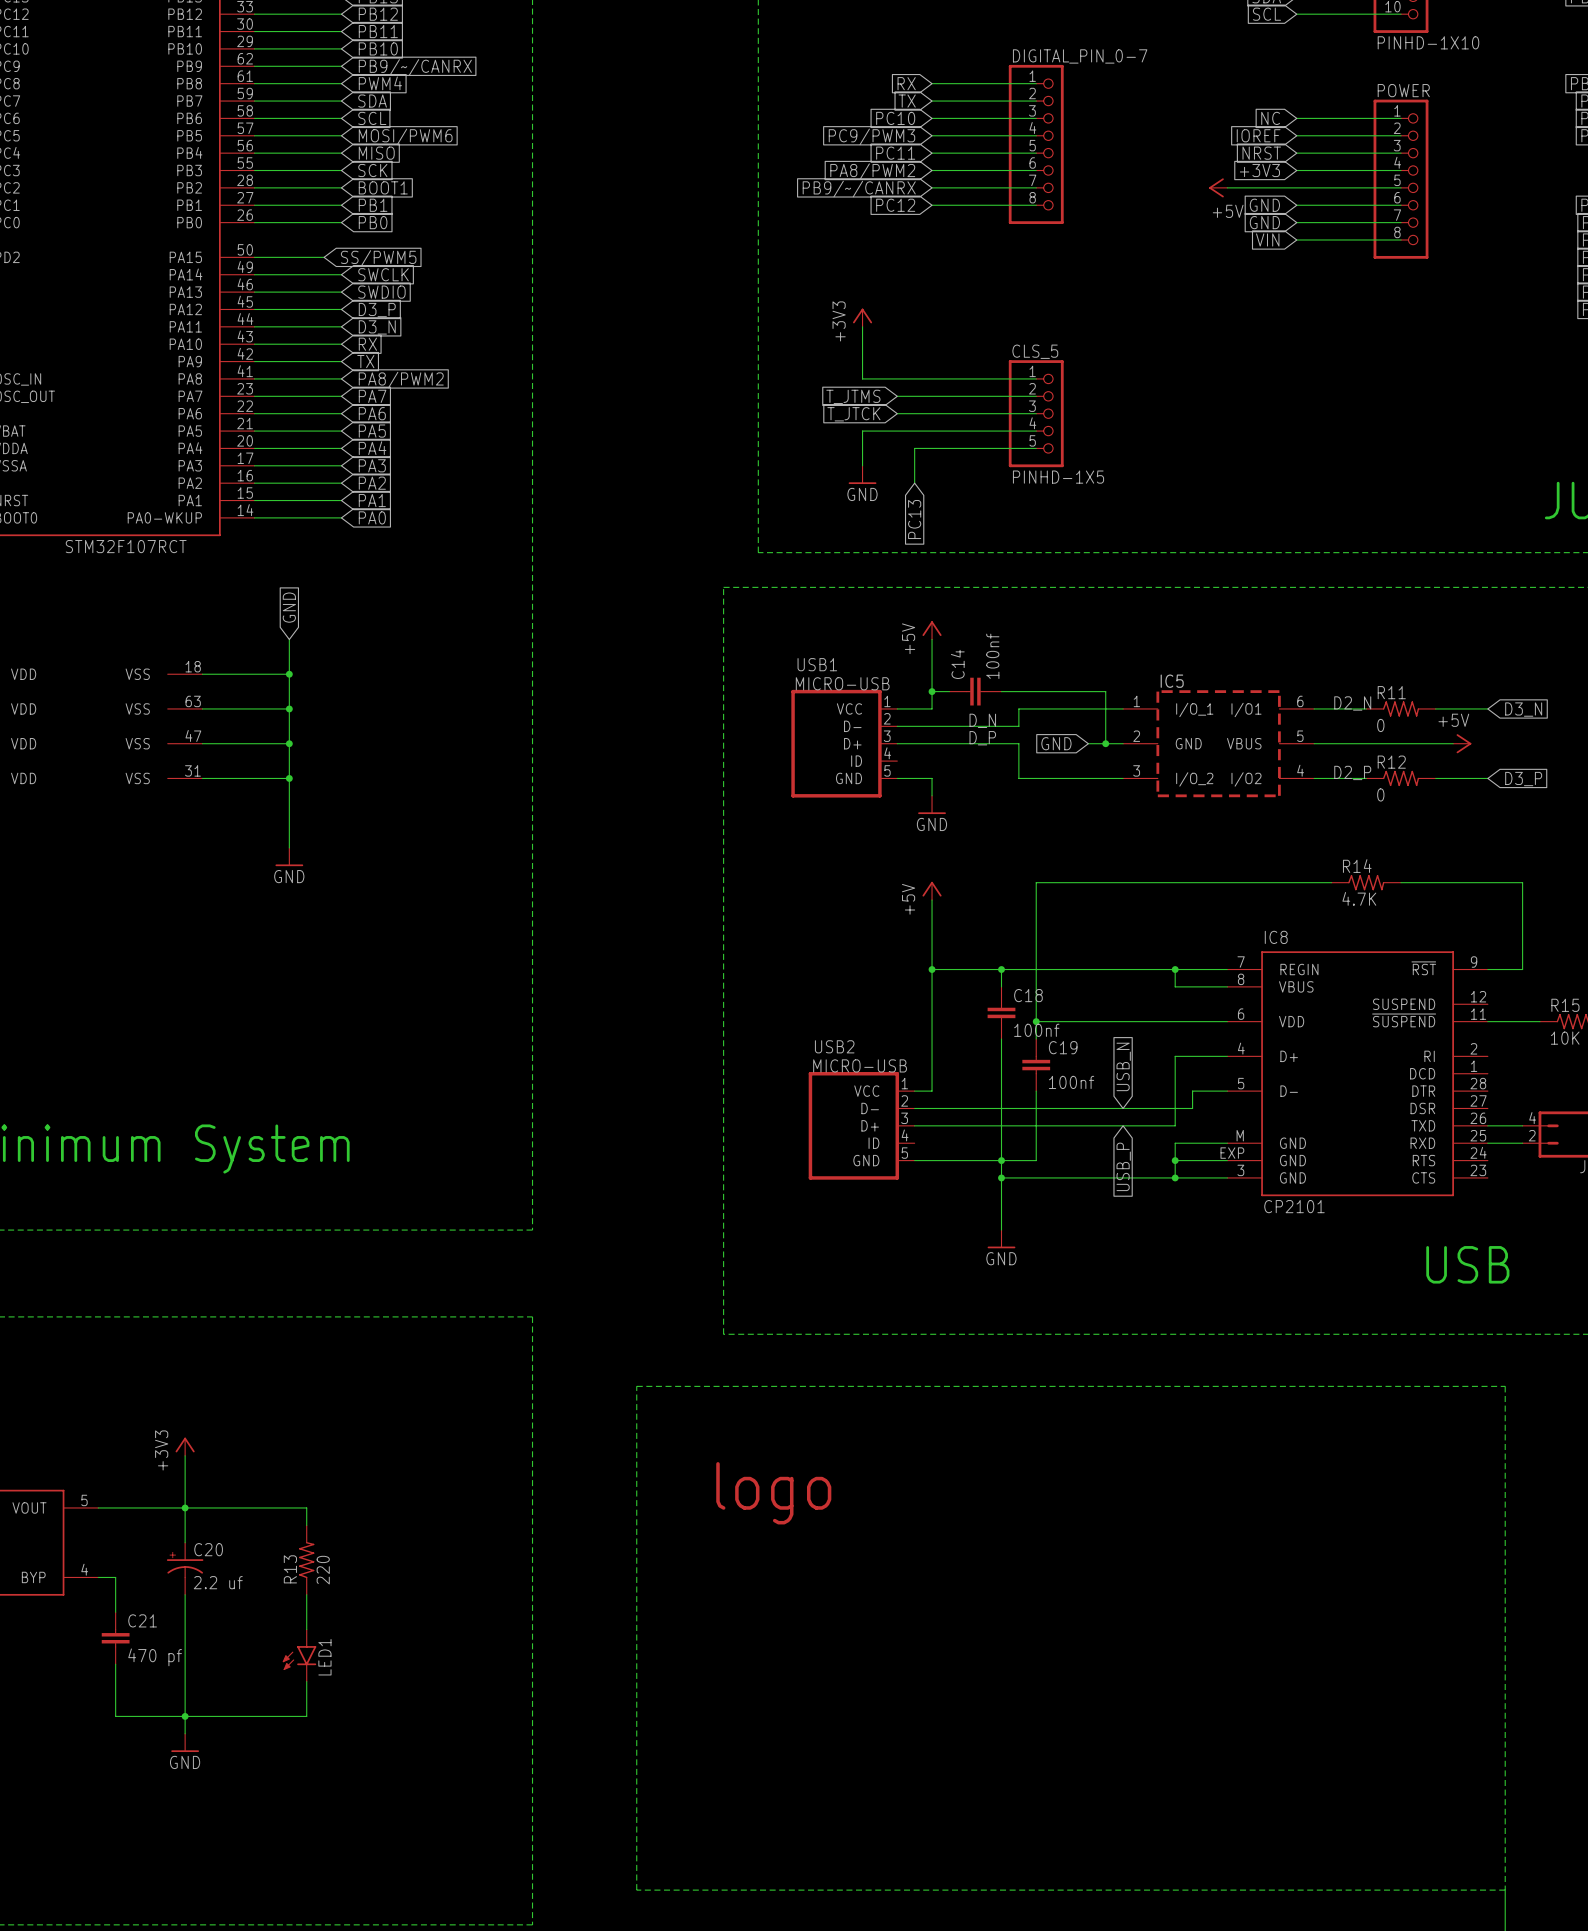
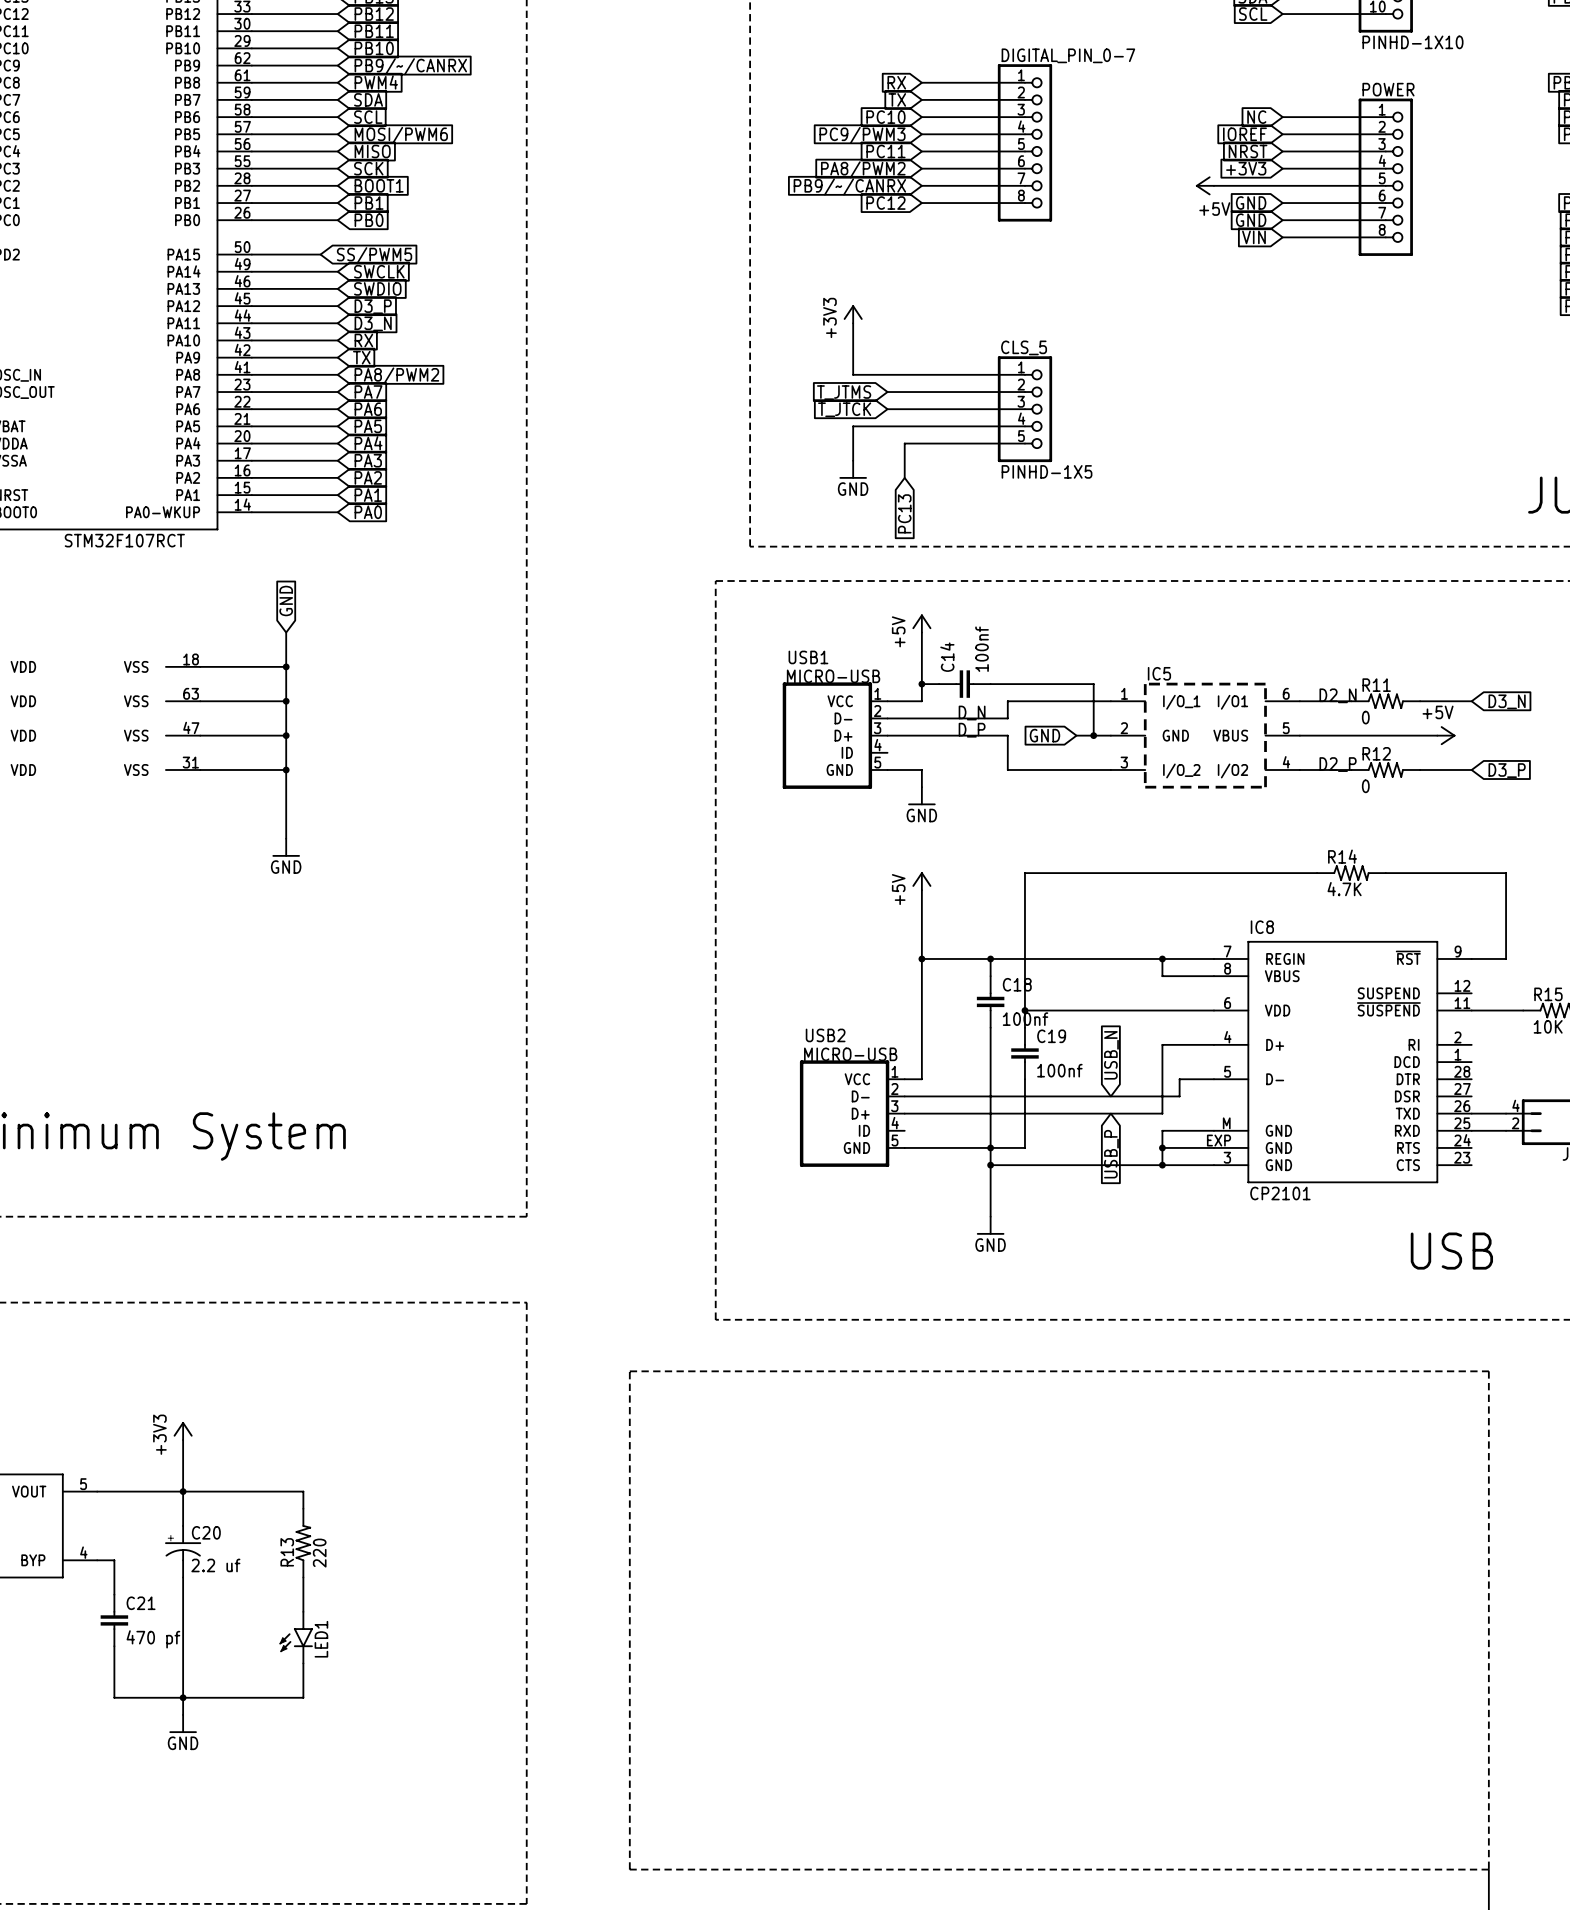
part: (773, 1493) -> none

